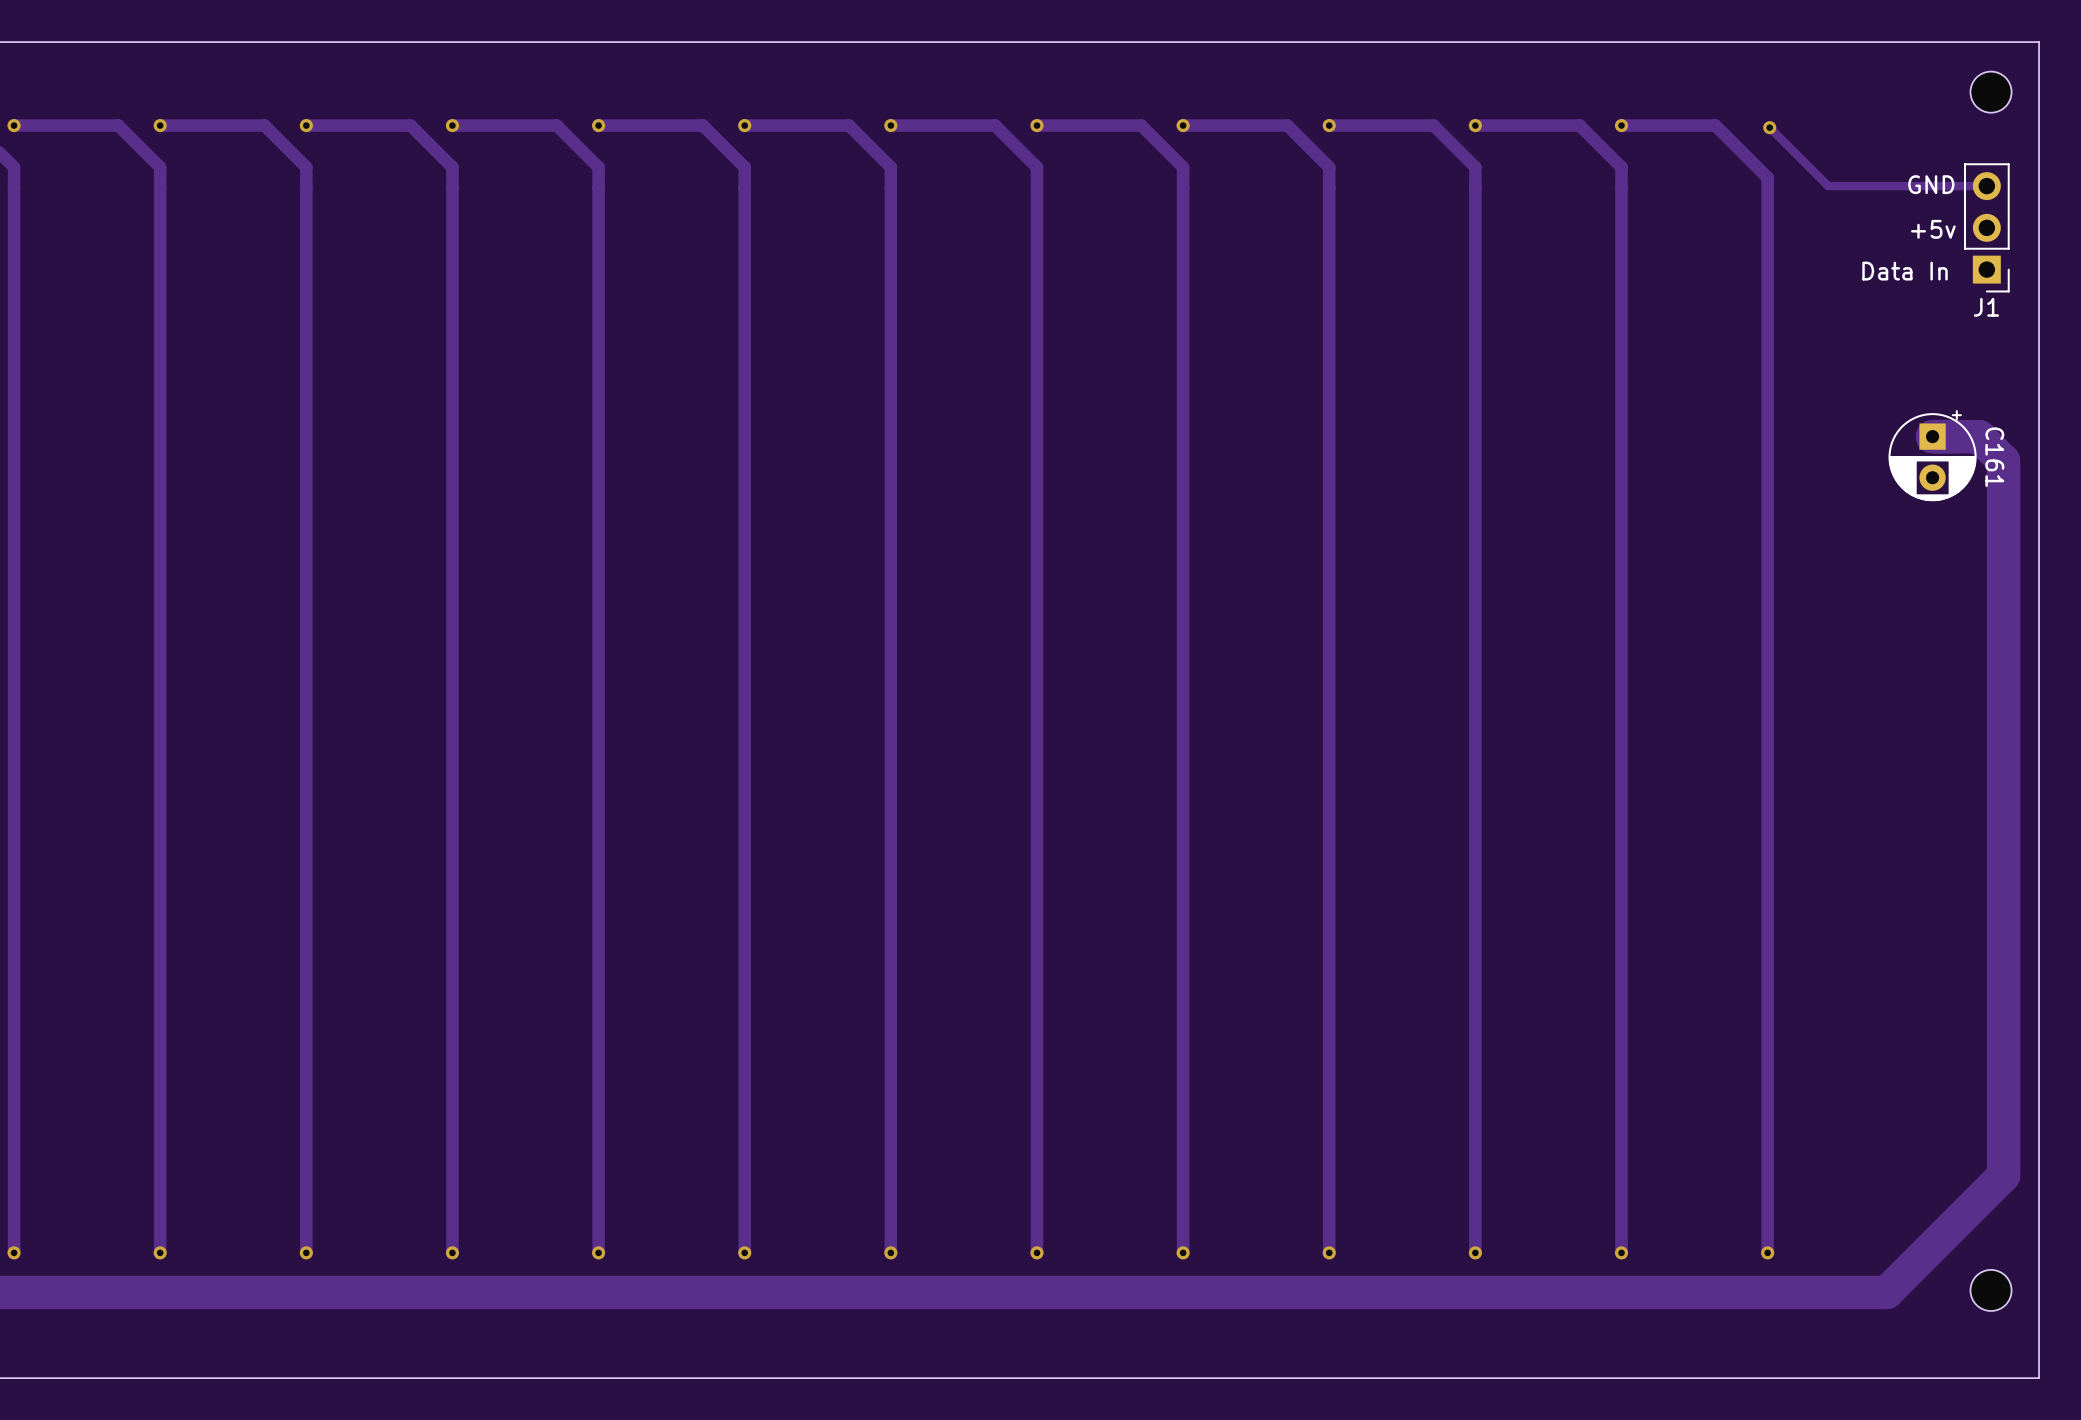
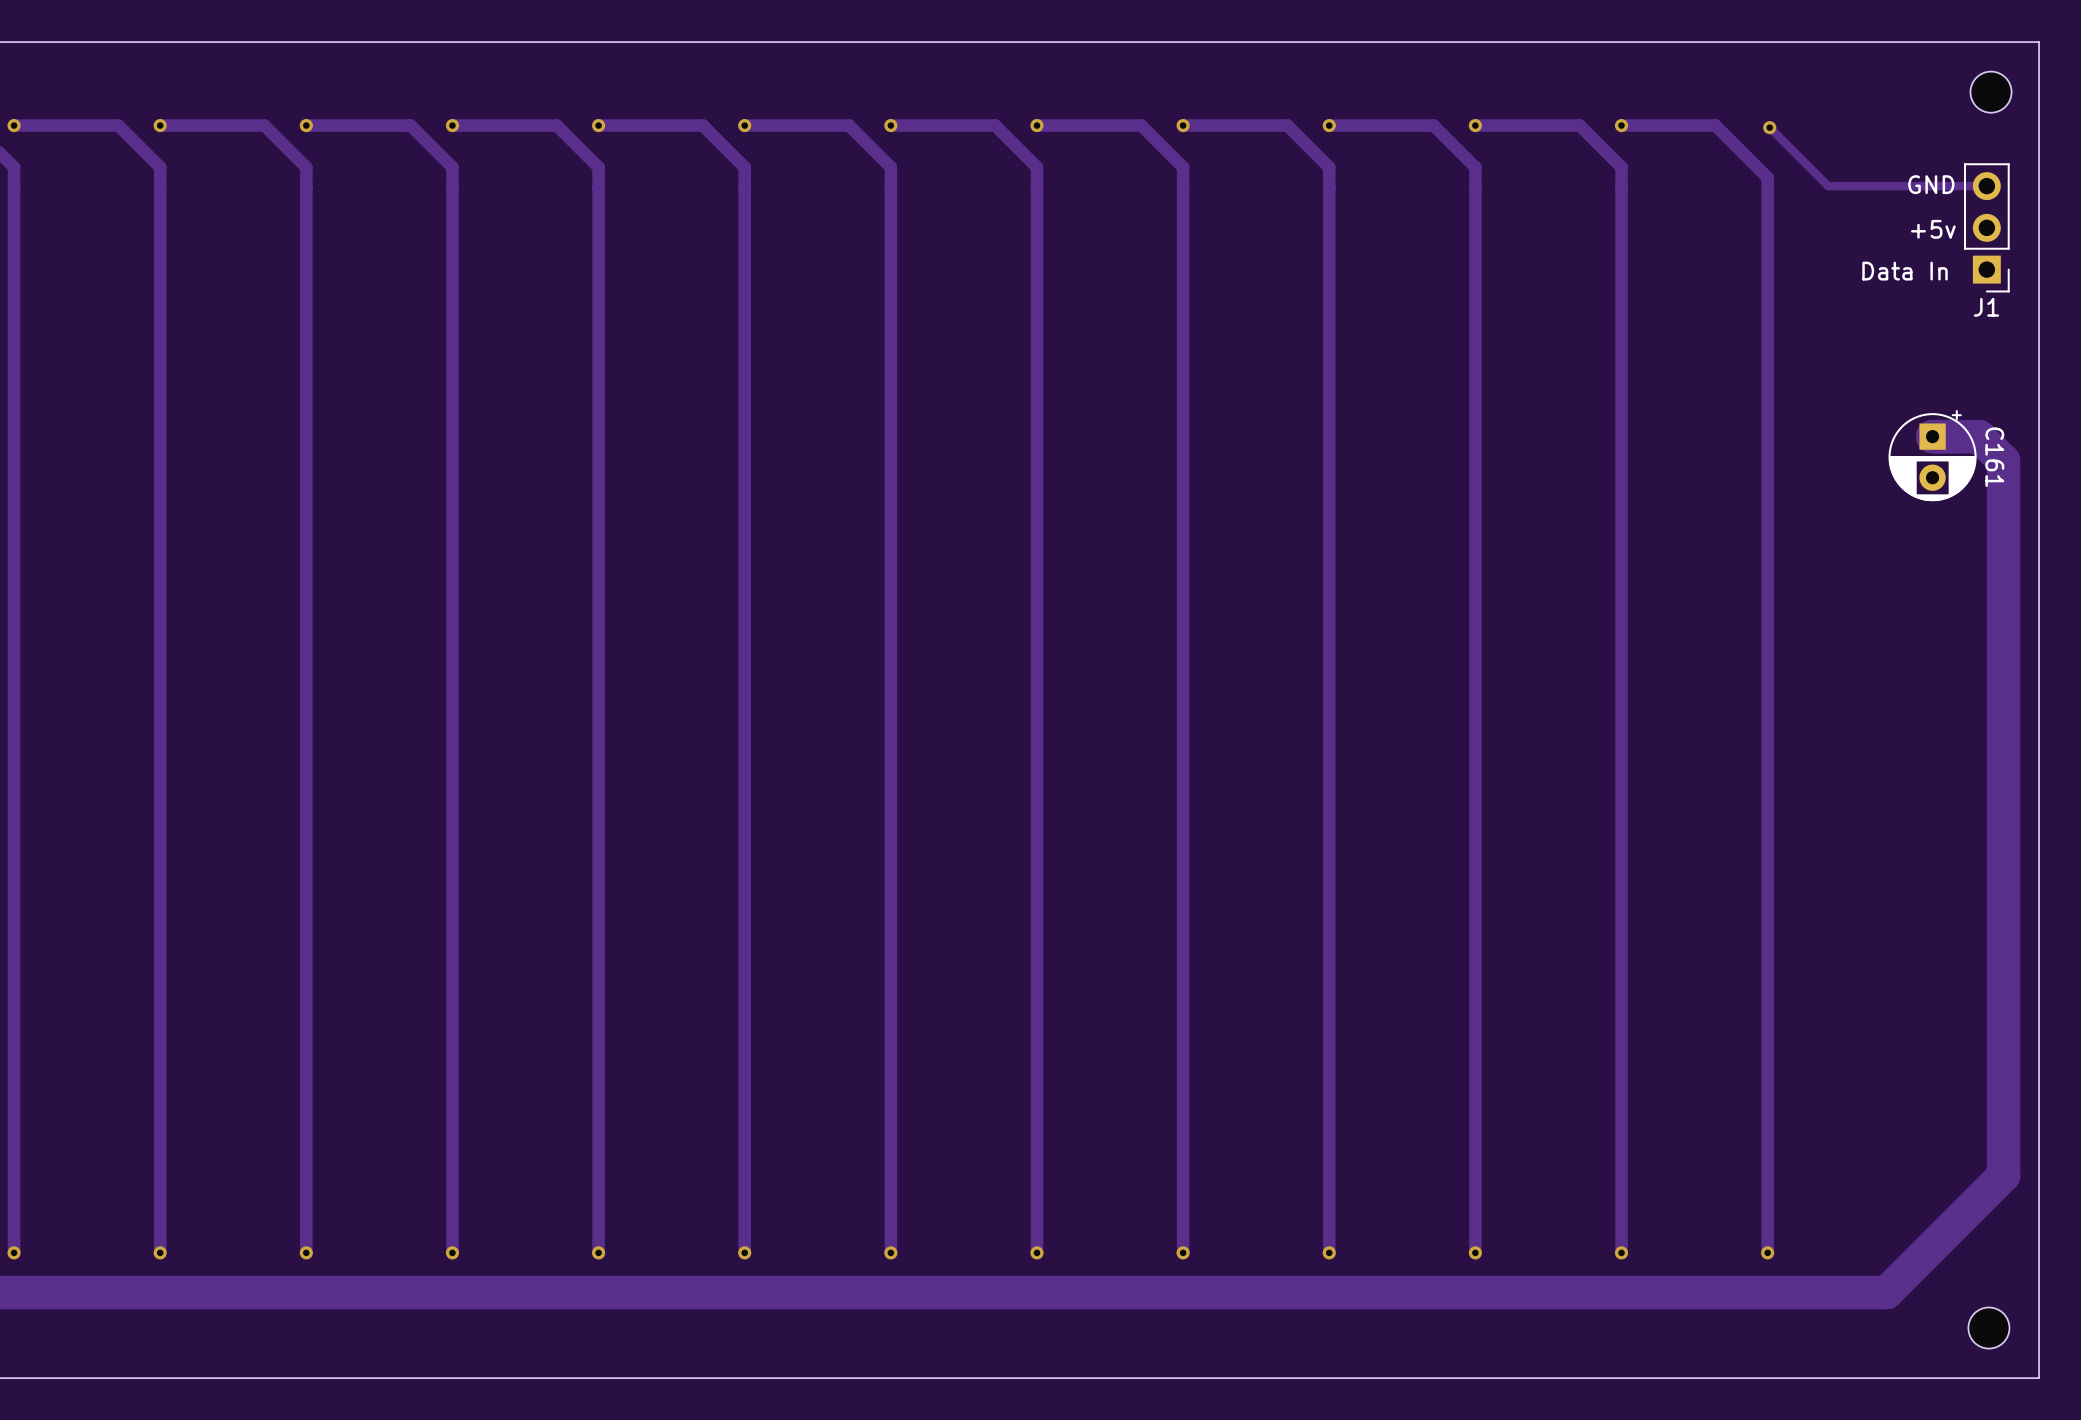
part position: (1991, 1290) -> (1988, 1328)

